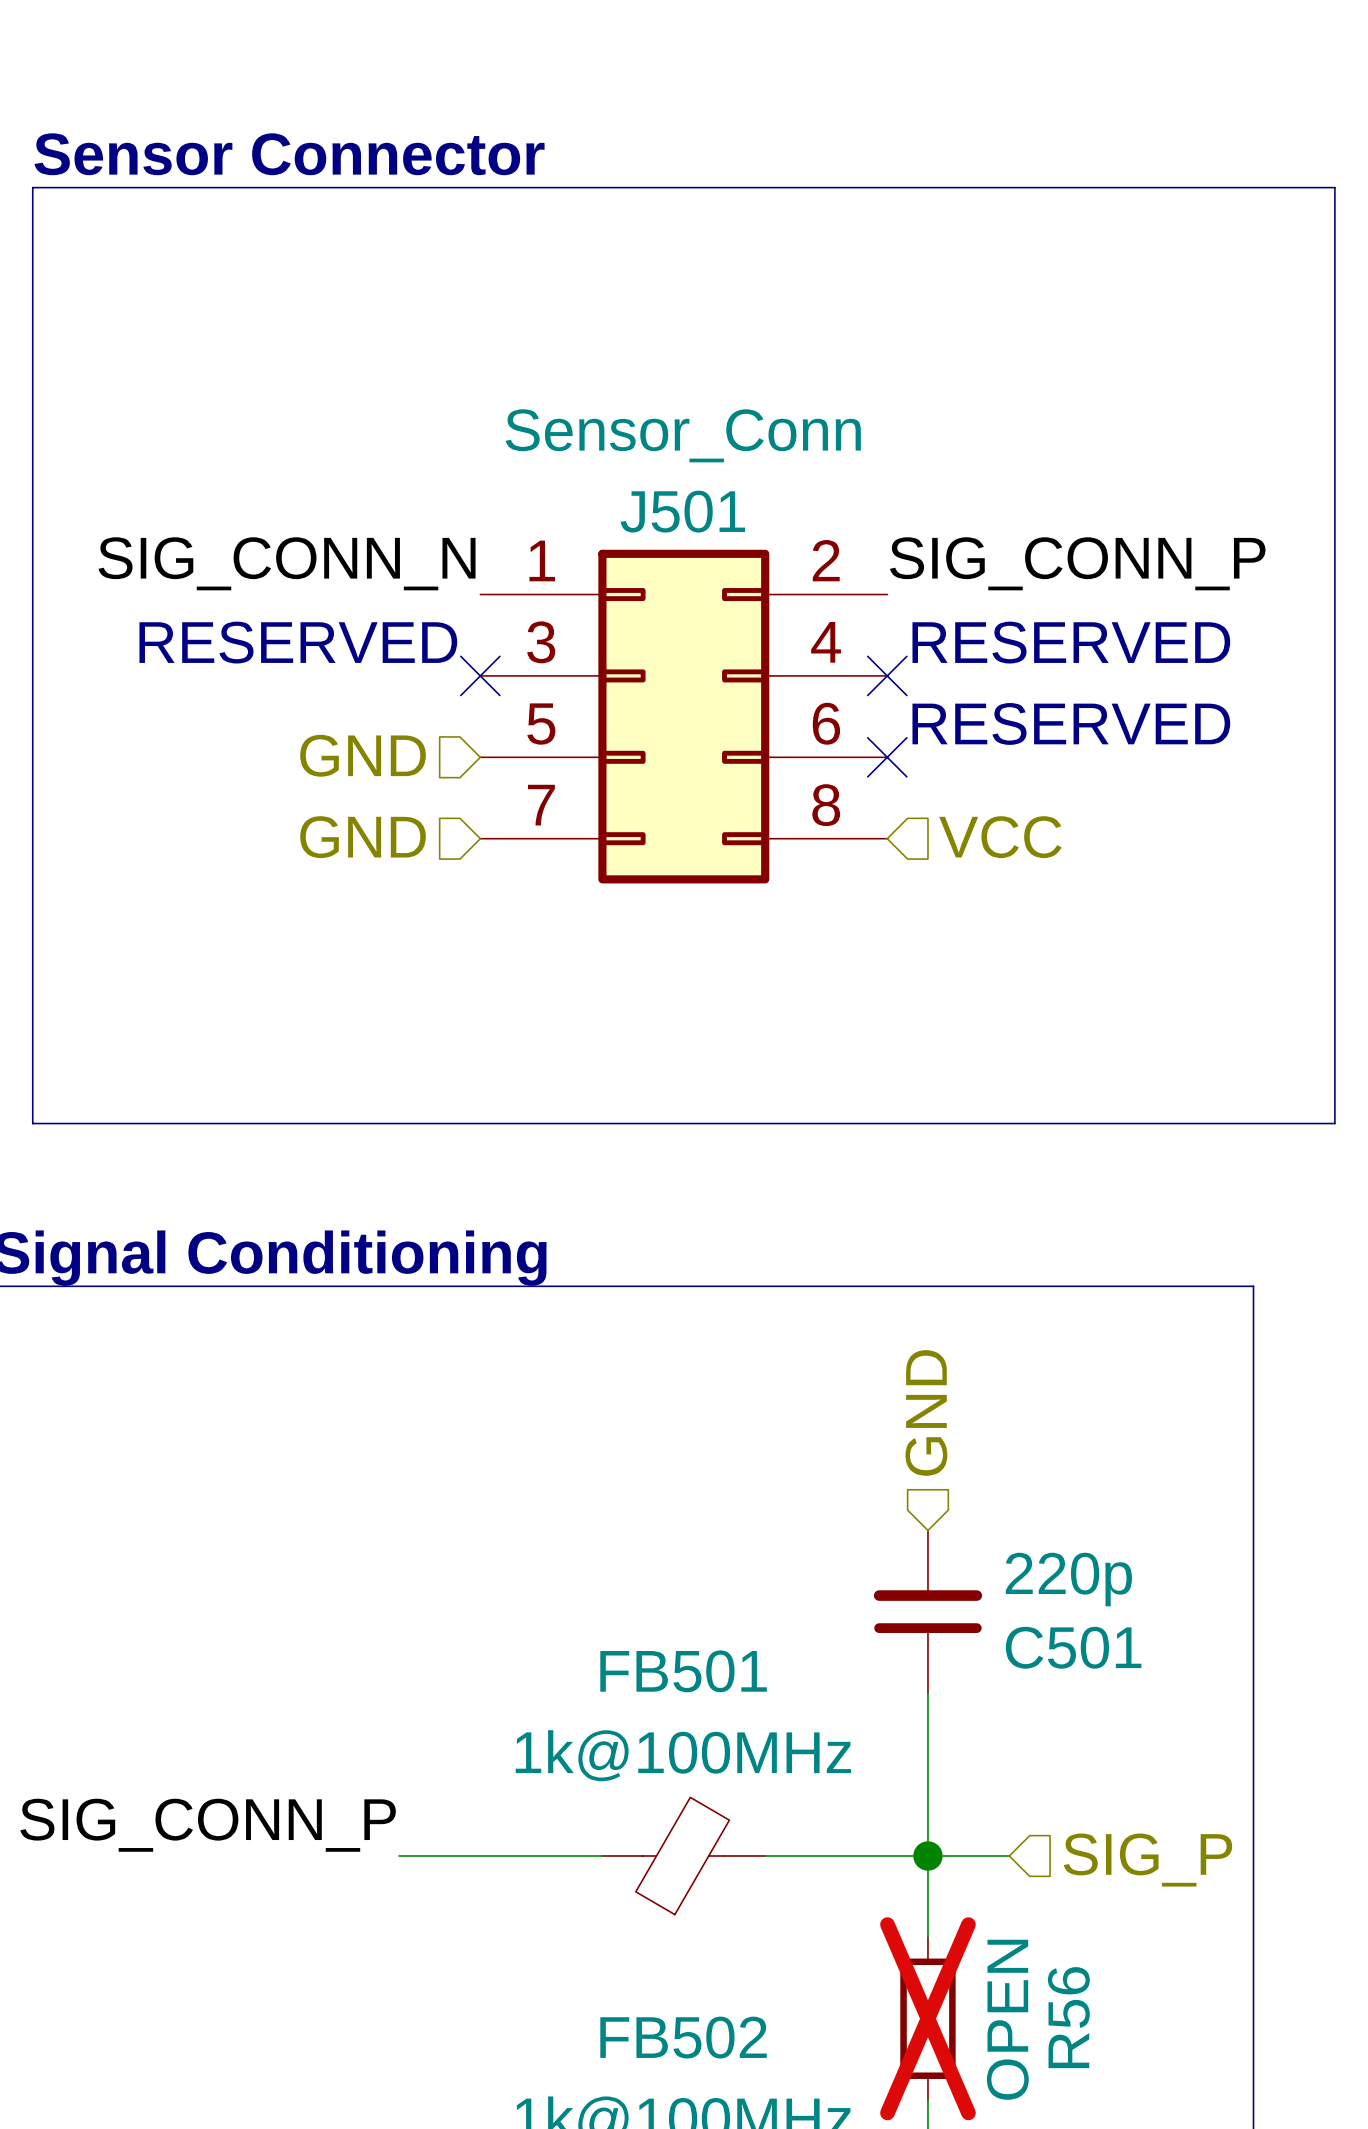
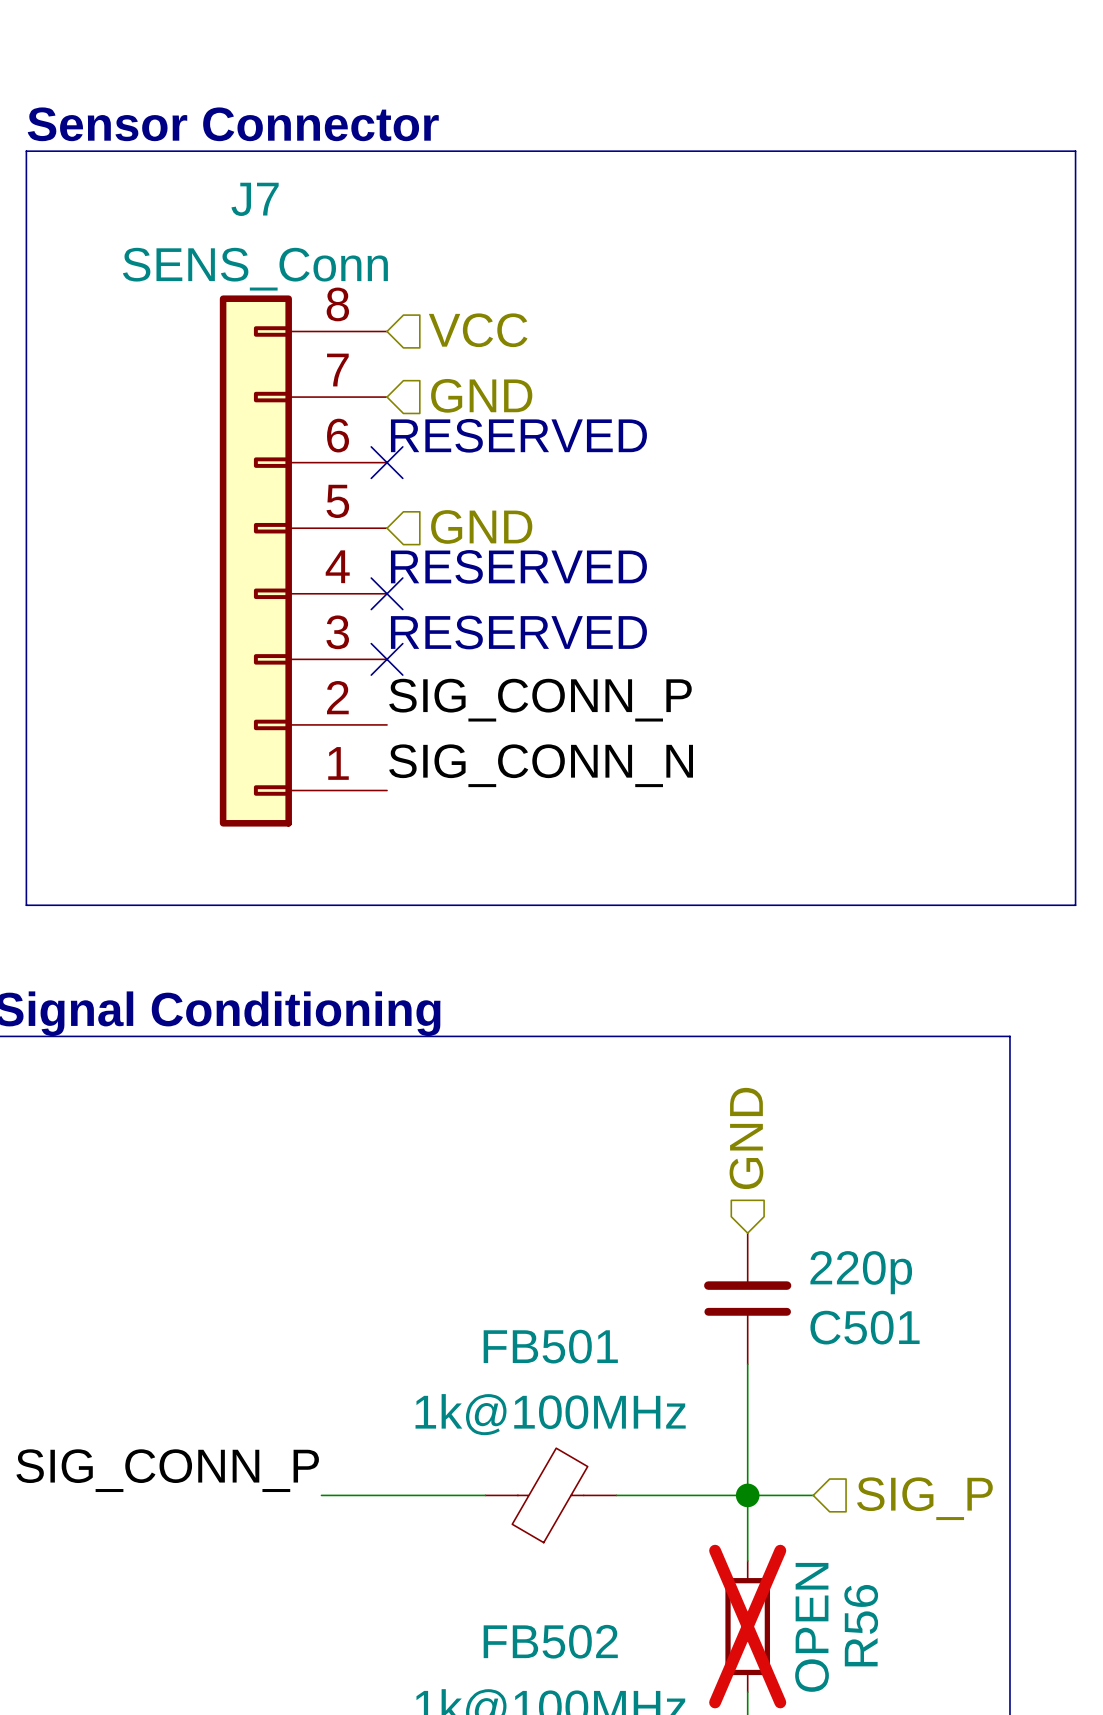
hierarchical label: none -> GND (481, 395)
text: none -> RESERVED (518, 435)
label position: SIG_CONN_N (287, 563) -> SIG_CONN_N (541, 765)
label position: SIG_CONN_P (1077, 563) -> SIG_CONN_P (540, 700)
no-connect mark: none -> (387, 462)
text: RESERVED (298, 642) -> none
text: RESERVED (1071, 642) -> none
hierarchical label: none -> GND (481, 526)
no-connect mark: (480, 675) -> none
no-connect mark: (887, 675) -> none
J7: none -> SENS_Conn (303, 561)
text: none -> RESERVED (518, 566)
J501: Sensor_Conn (683, 716) -> none
text: RESERVED (1071, 723) -> none
no-connect mark: none -> (387, 593)
hierarchical label: GND (363, 755) -> none
no-connect mark: (887, 757) -> none
text: none -> RESERVED (518, 632)
no-connect mark: none -> (387, 659)
hierarchical label: GND (363, 837) -> none
hierarchical label position: VCC (1000, 837) -> VCC (478, 330)

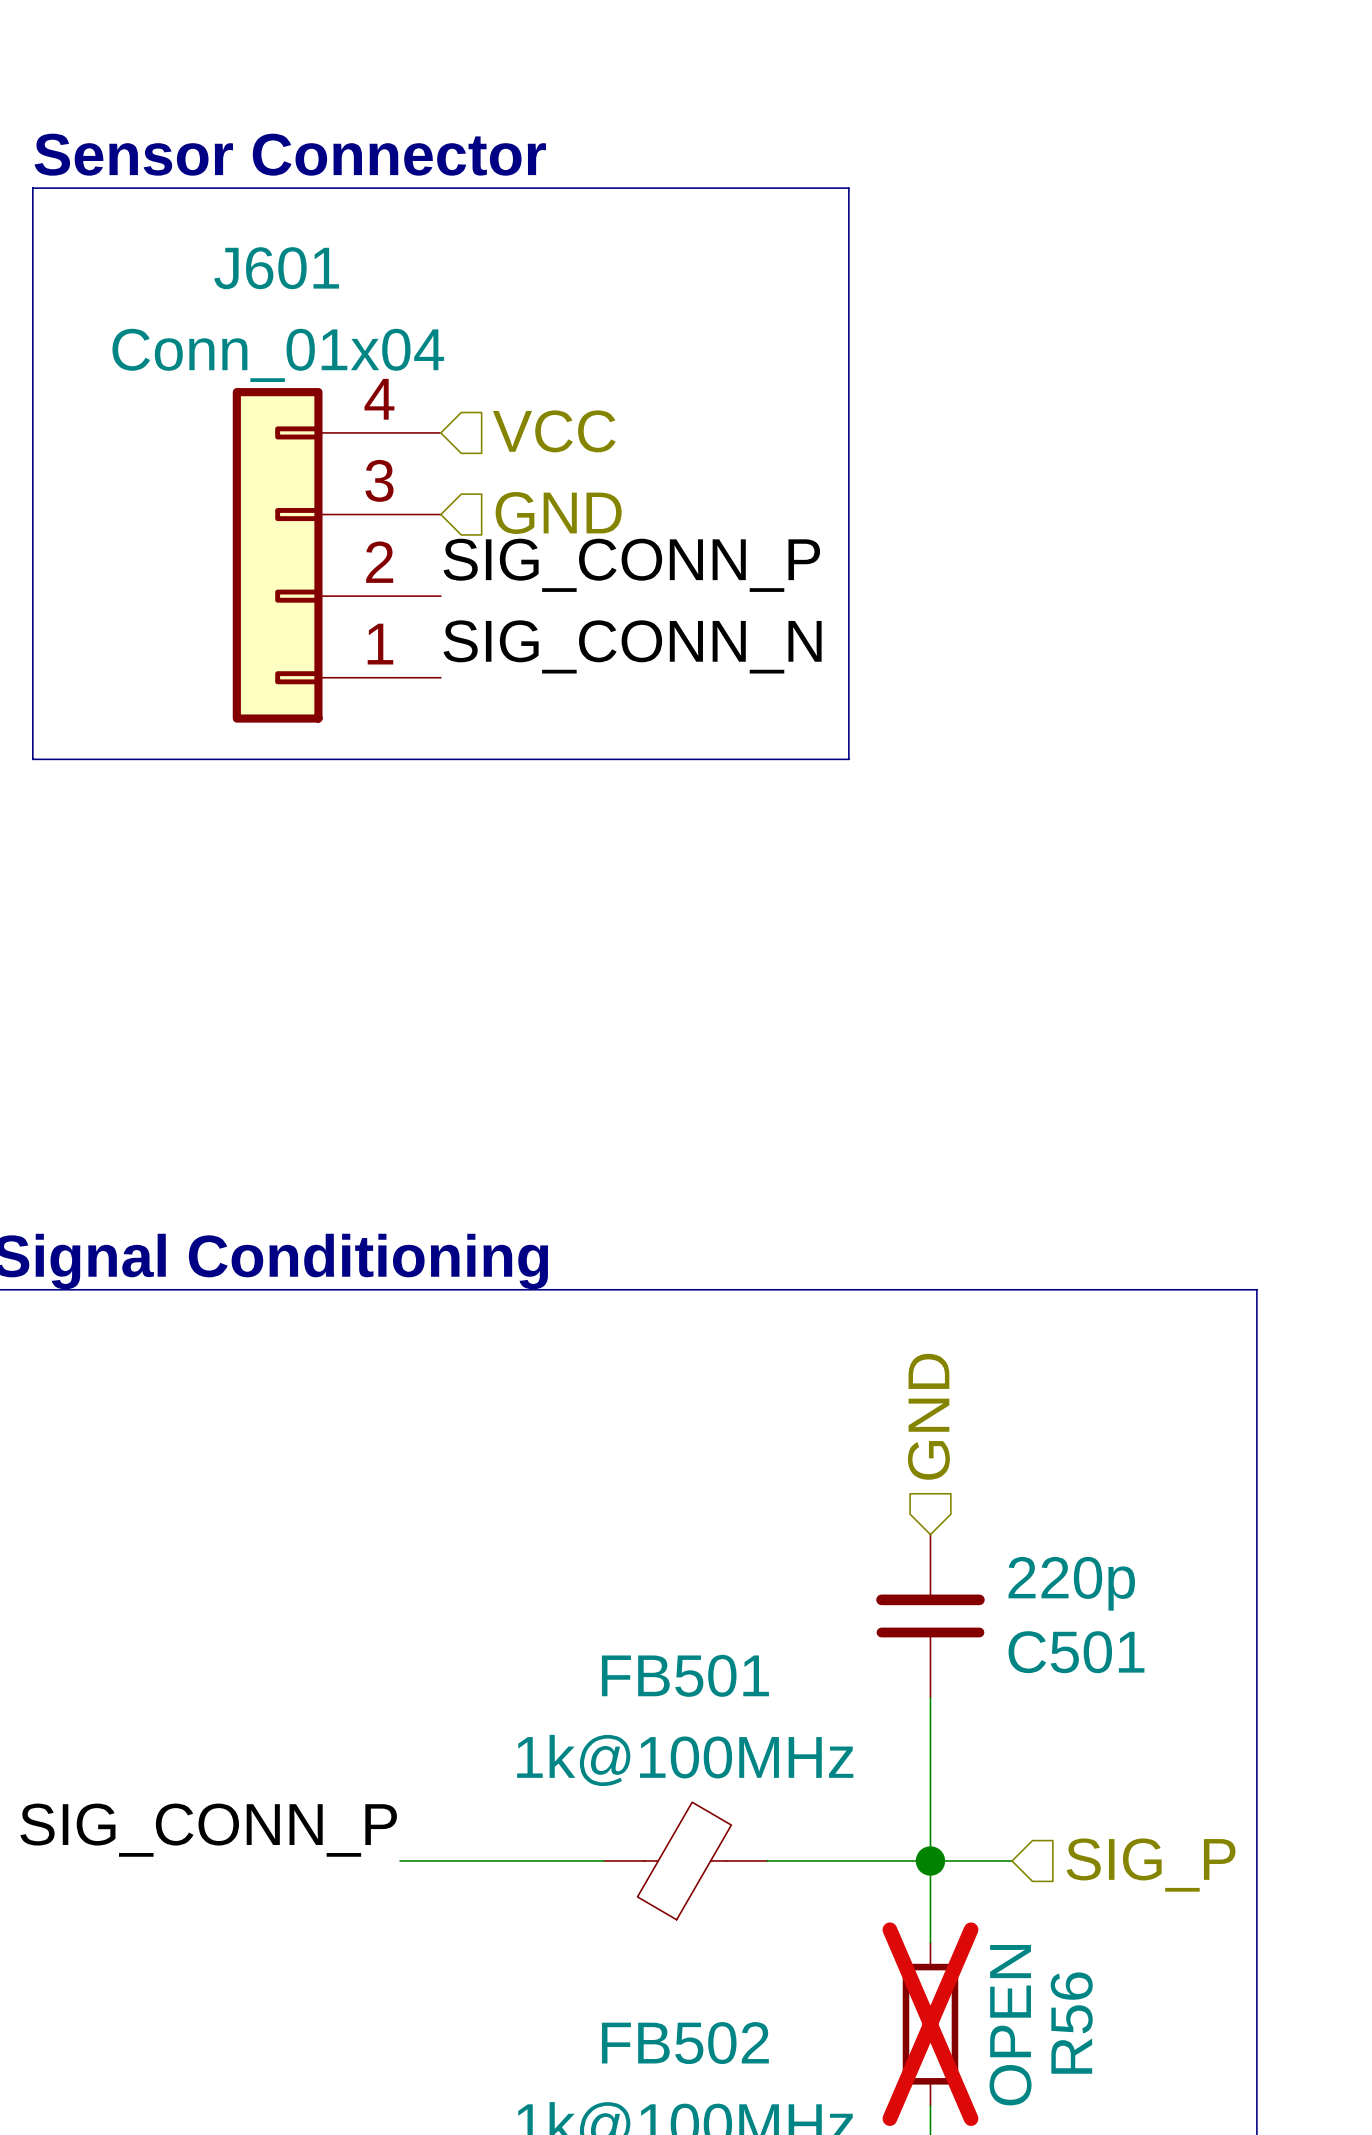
line: (682, 151) (1075, 151) (1075, 905) (26, 905) (26, 610) -> (848, 188) (848, 759) (32, 759)
hierarchical label position: VCC (478, 330) -> VCC (554, 431)
hierarchical label position: GND (481, 395) -> GND (558, 513)
text: RESERVED (518, 435) -> none
J601: none -> Conn_01x04 (336, 555)
no-connect mark: (387, 462) -> none
hierarchical label: GND (481, 526) -> none
J7: SENS_Conn (303, 561) -> none
text: RESERVED (518, 566) -> none
no-connect mark: (387, 593) -> none
text: RESERVED (518, 632) -> none
no-connect mark: (387, 659) -> none
label position: SIG_CONN_P (540, 700) -> SIG_CONN_P (631, 565)
label position: SIG_CONN_N (541, 765) -> SIG_CONN_N (632, 646)

